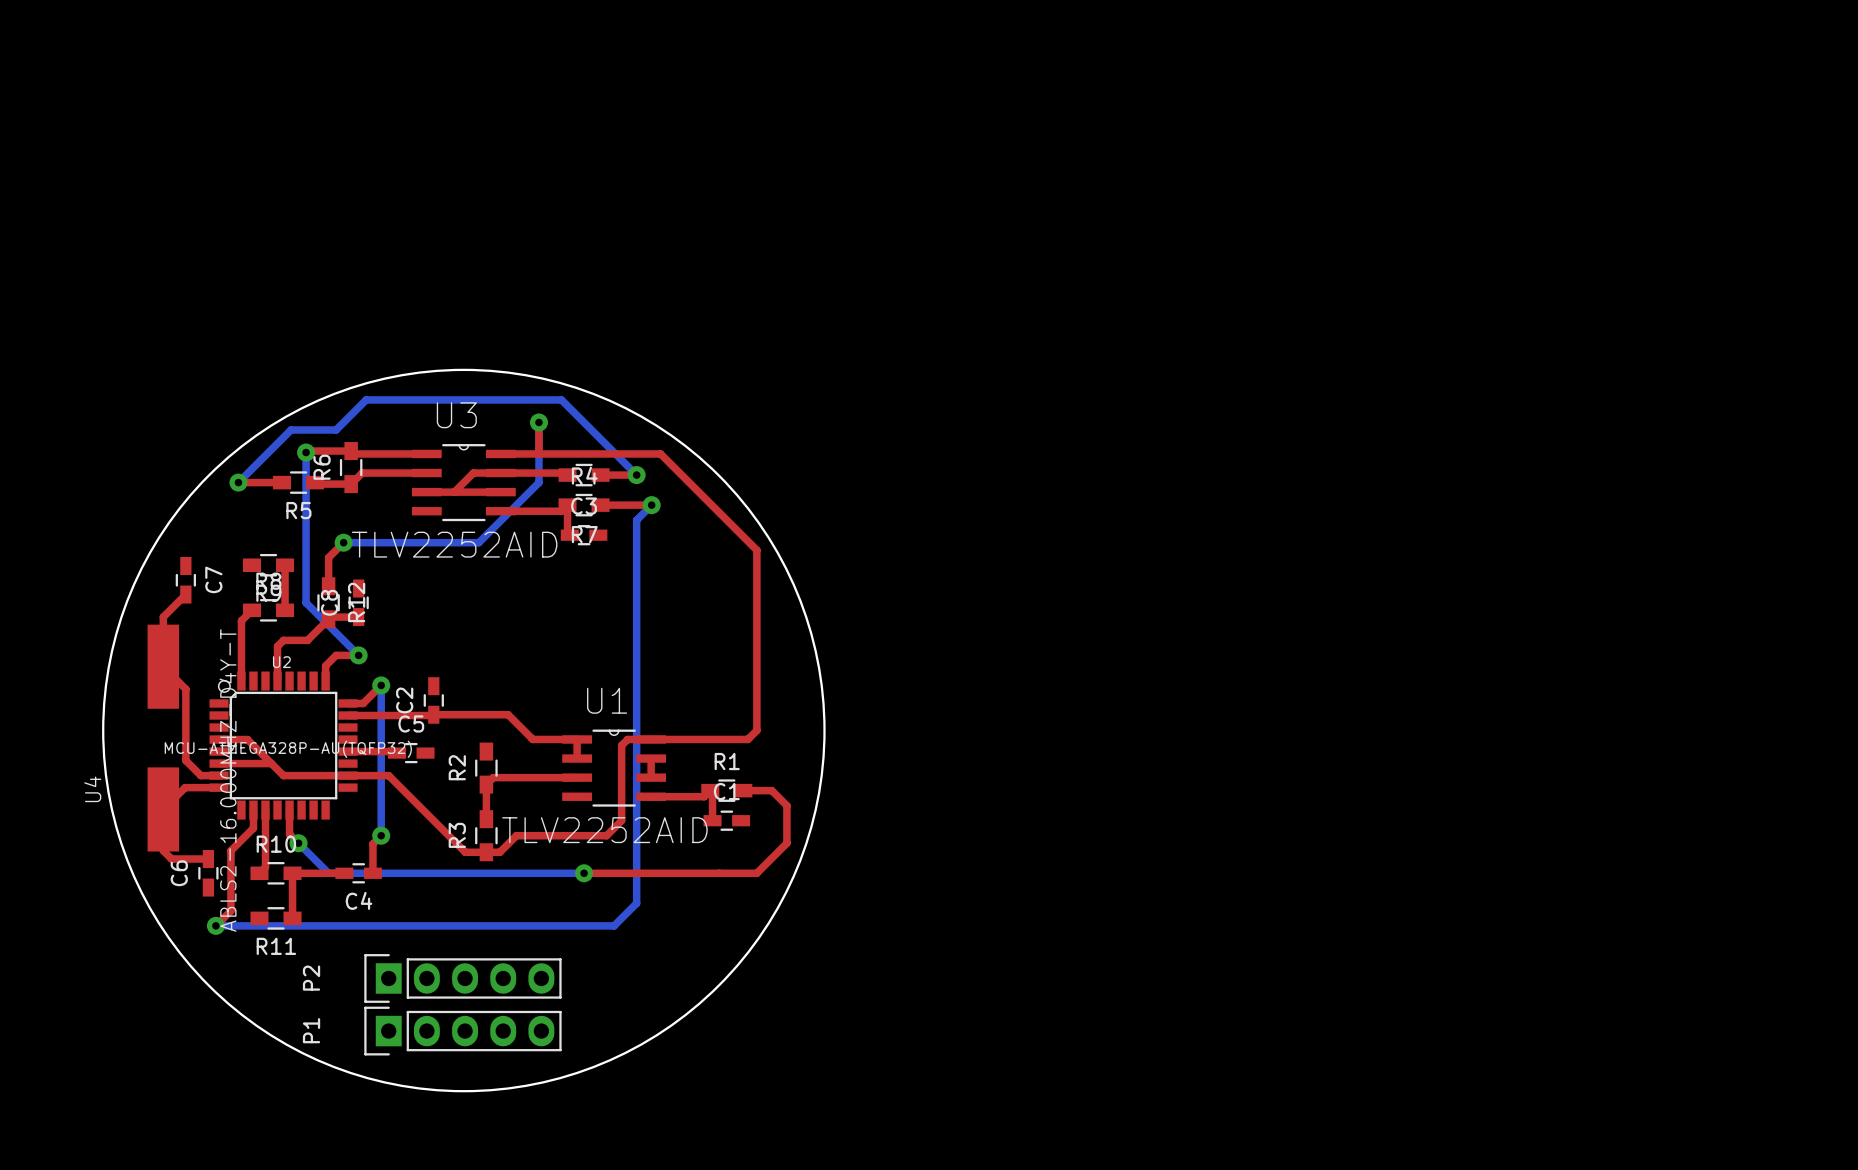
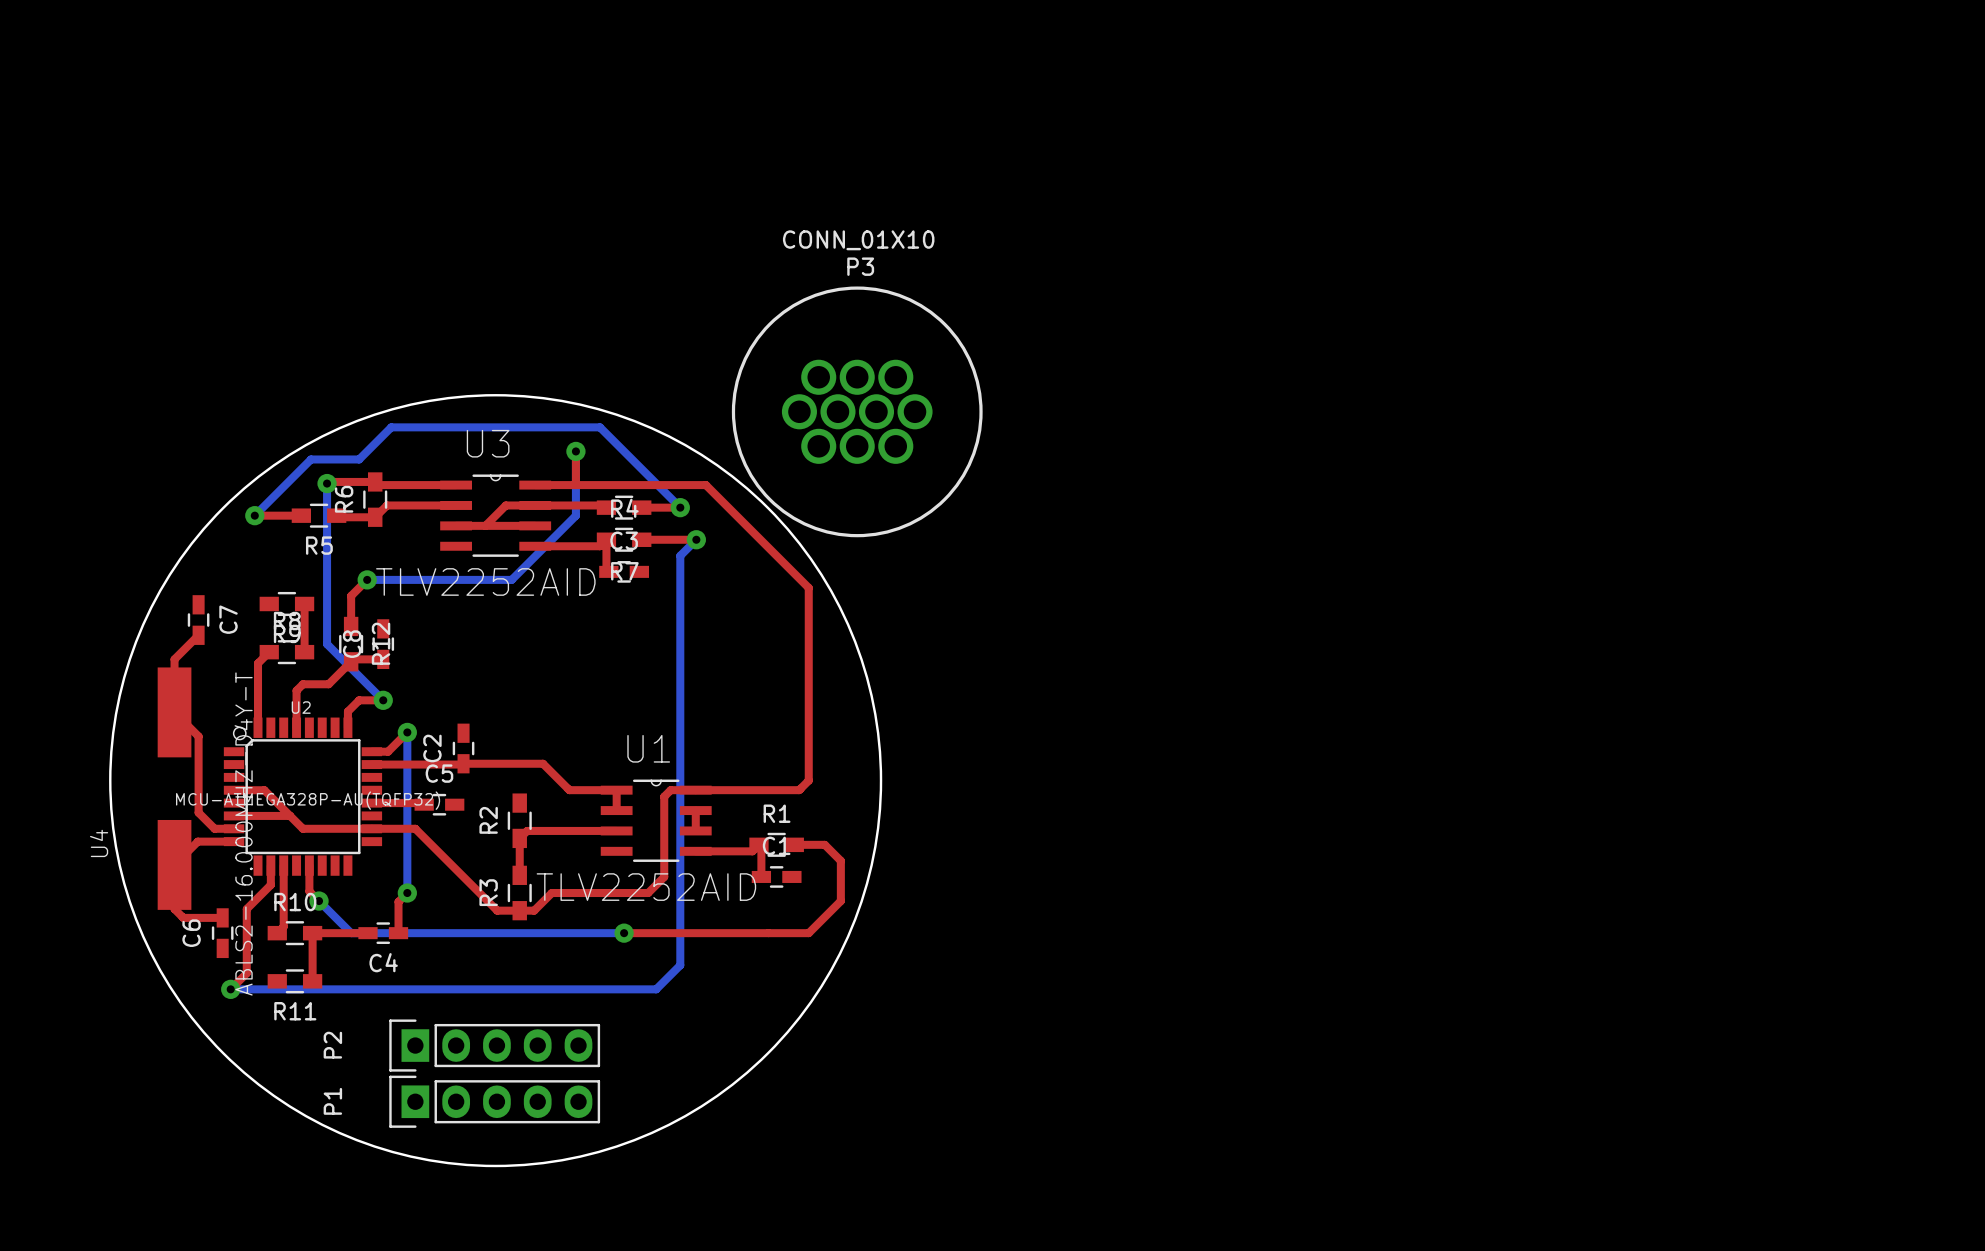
P3: none -> CONN_01X10 (857, 411)

